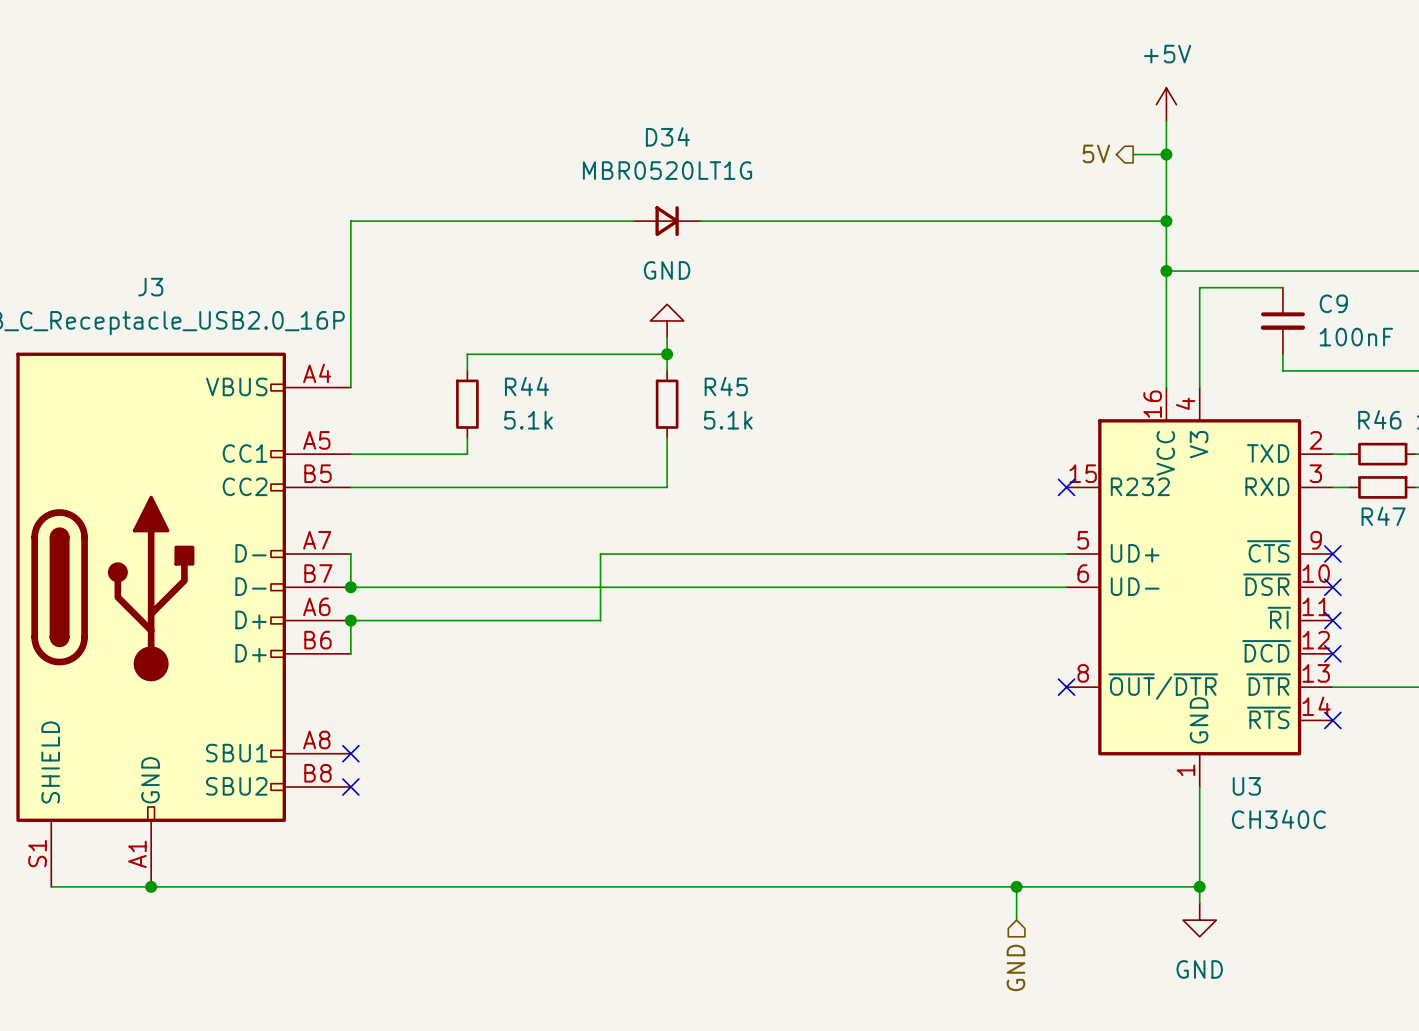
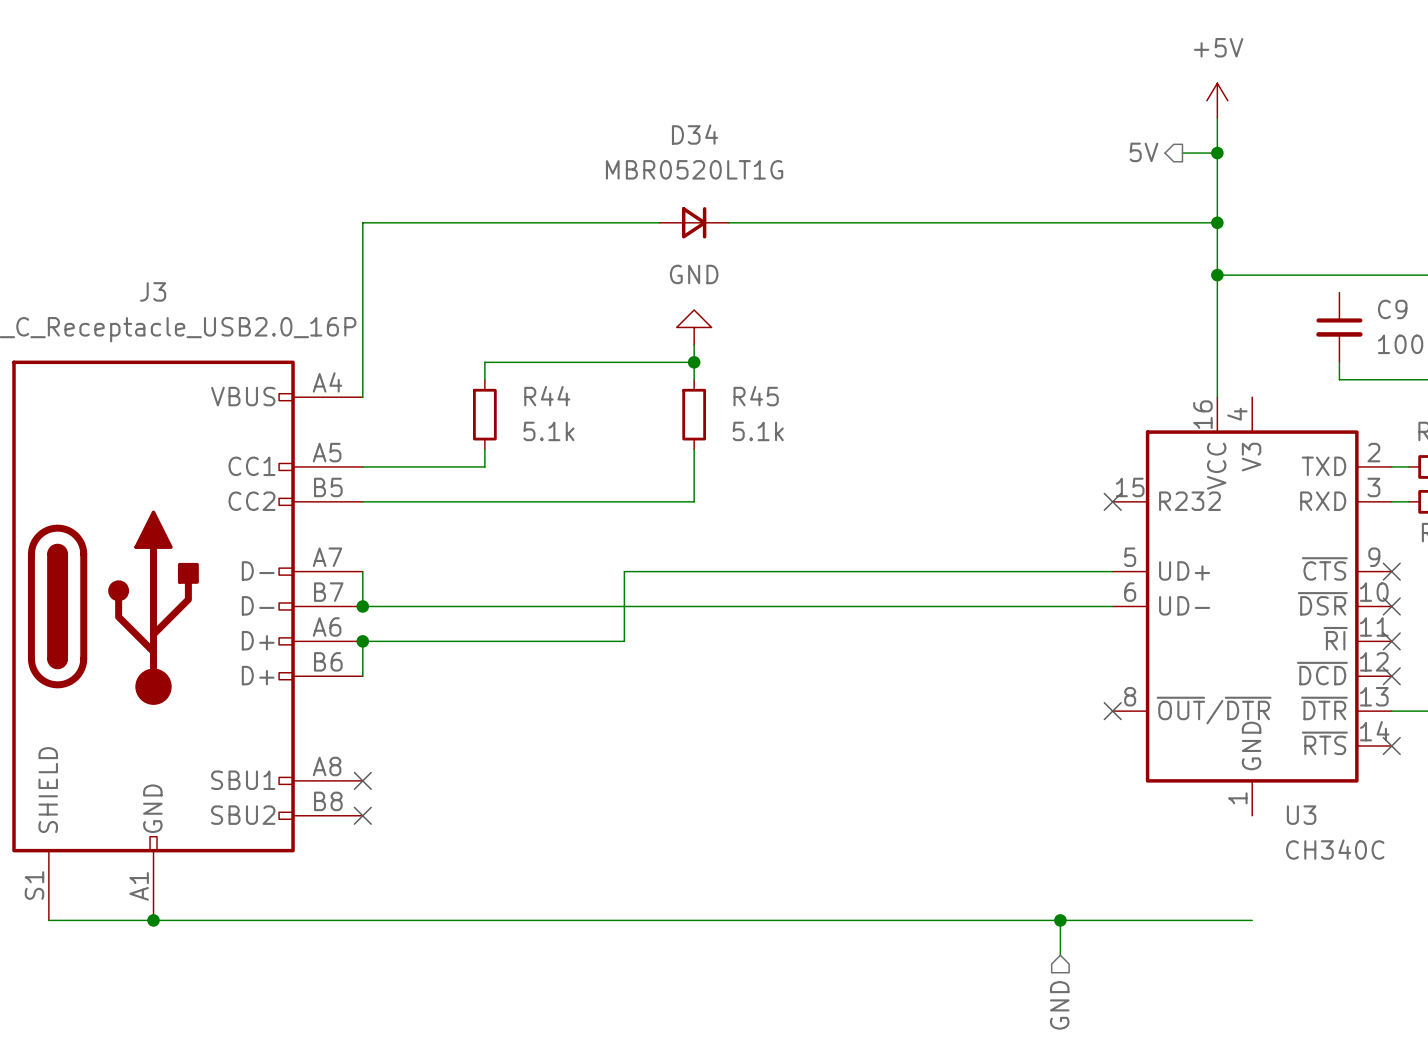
wire: (1282, 287) (1199, 287) (1199, 387) -> none
wire: (1199, 787) (1199, 903) -> none
junction: (1199, 886) -> none
power symbol: GND (1199, 920) -> none

